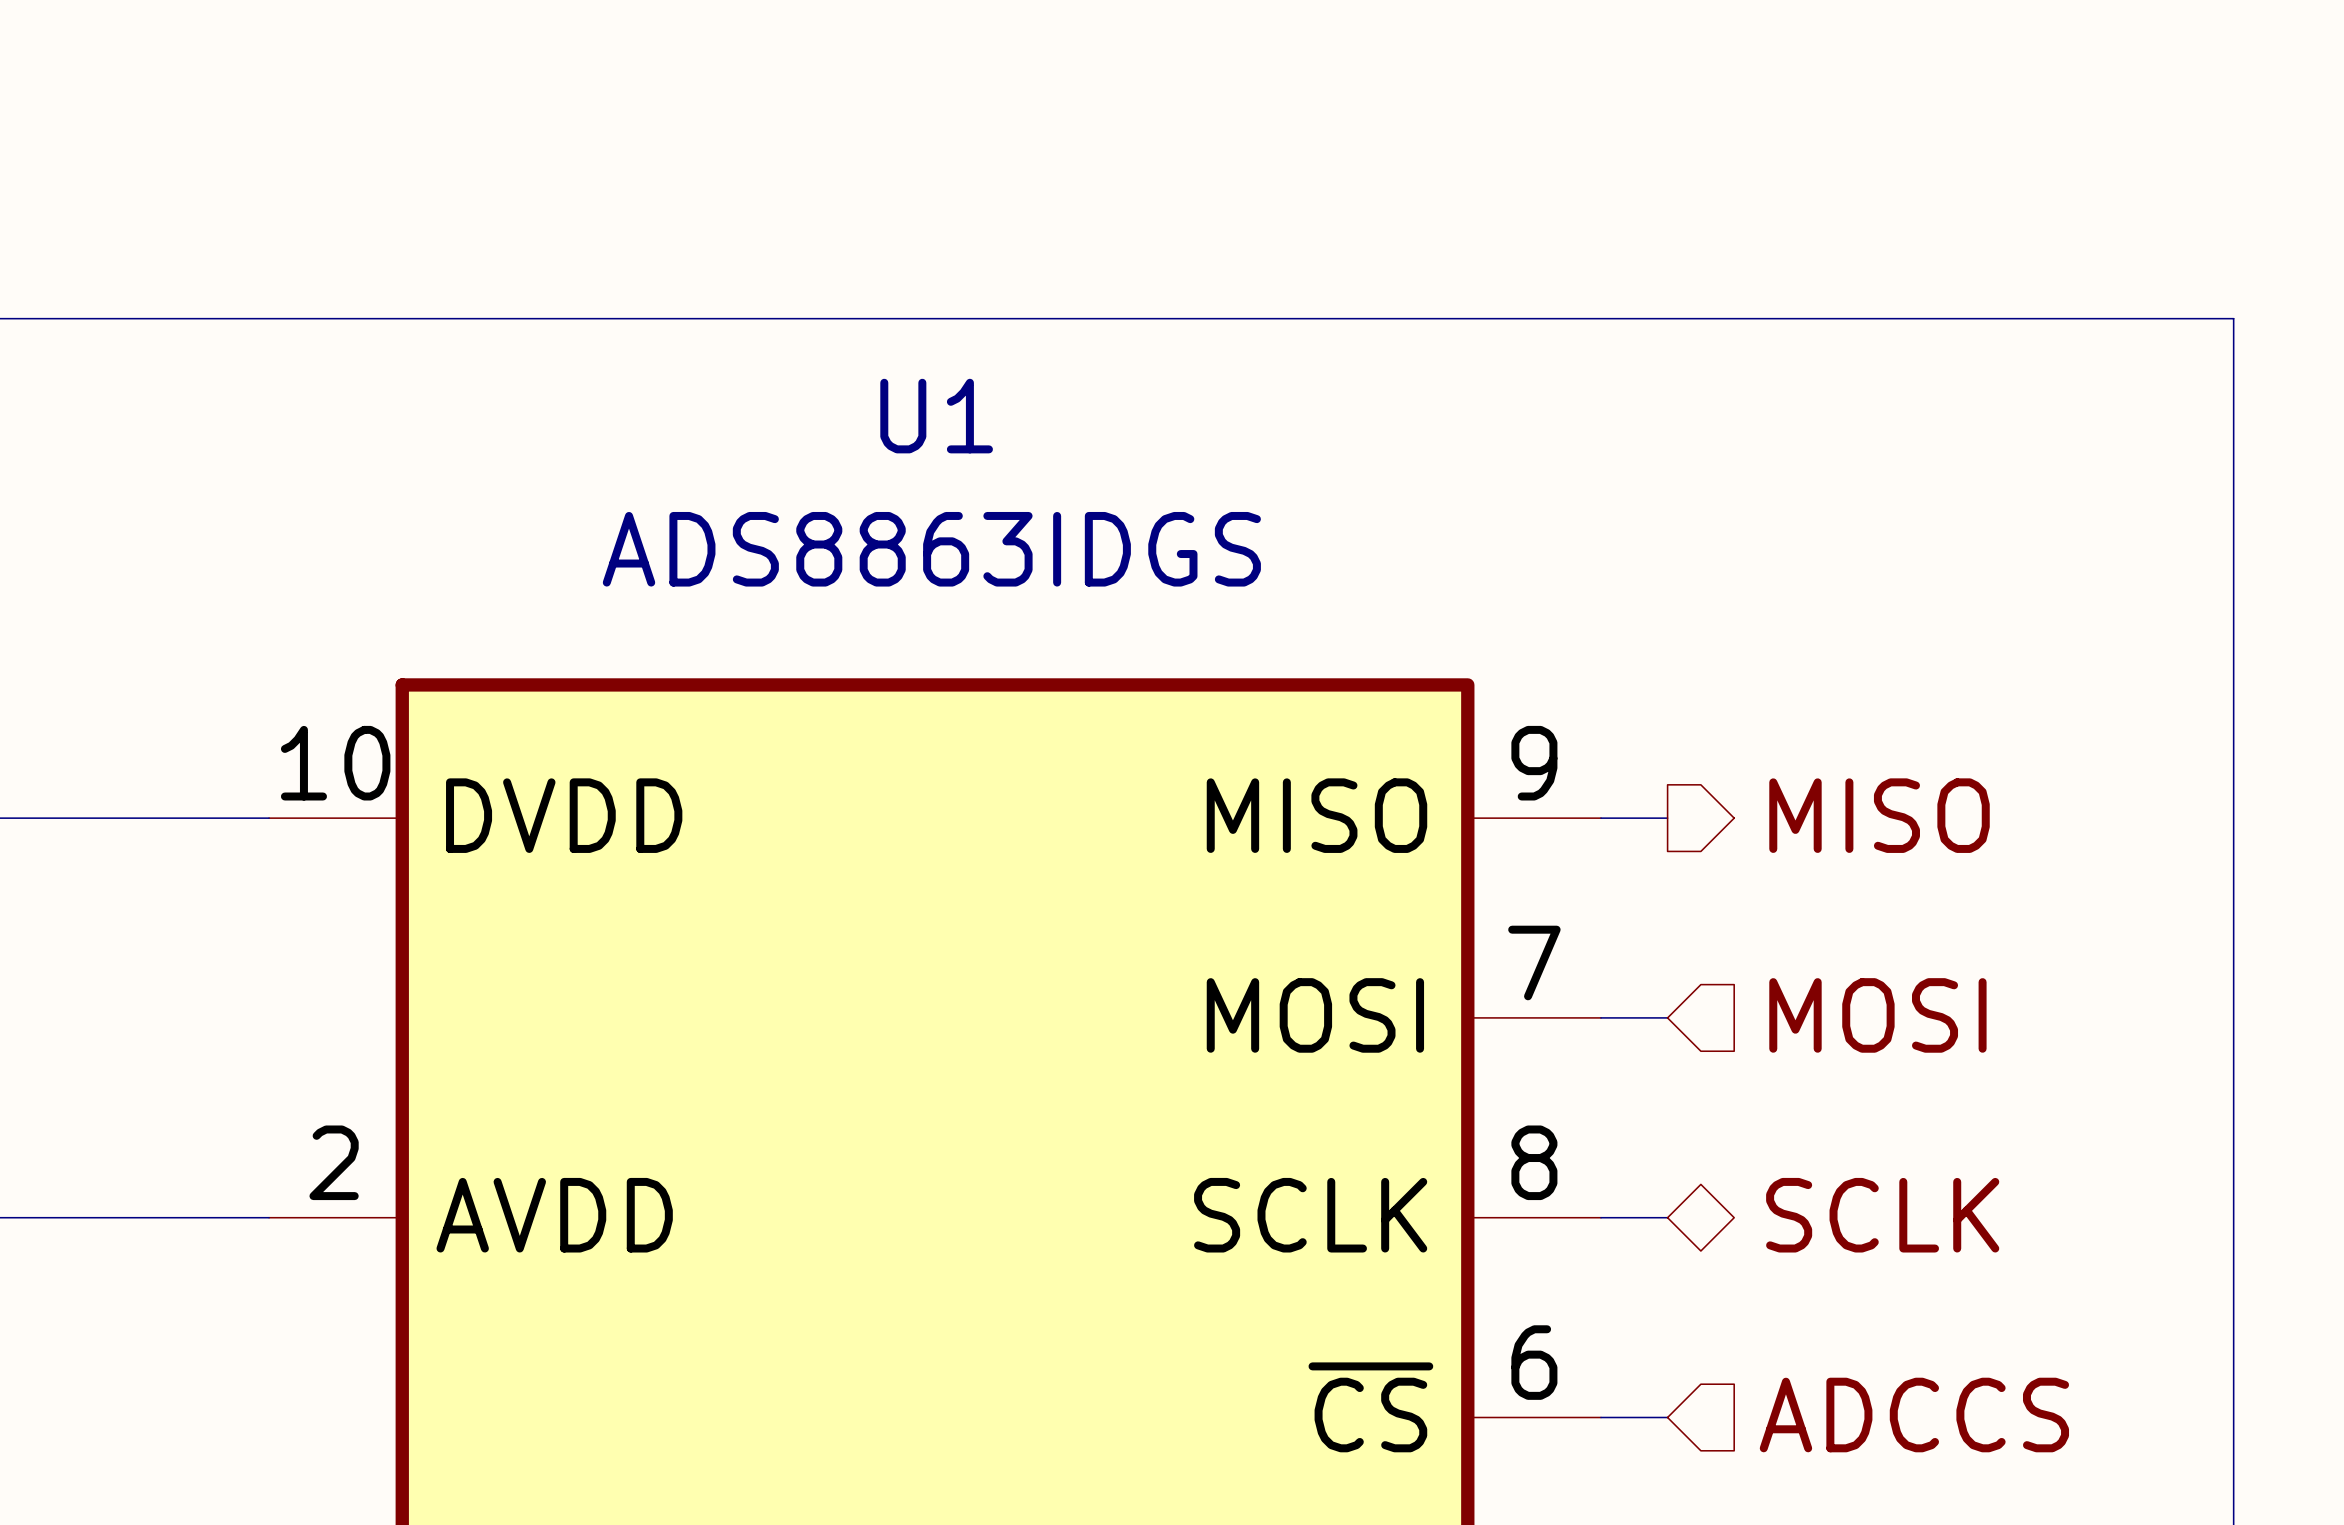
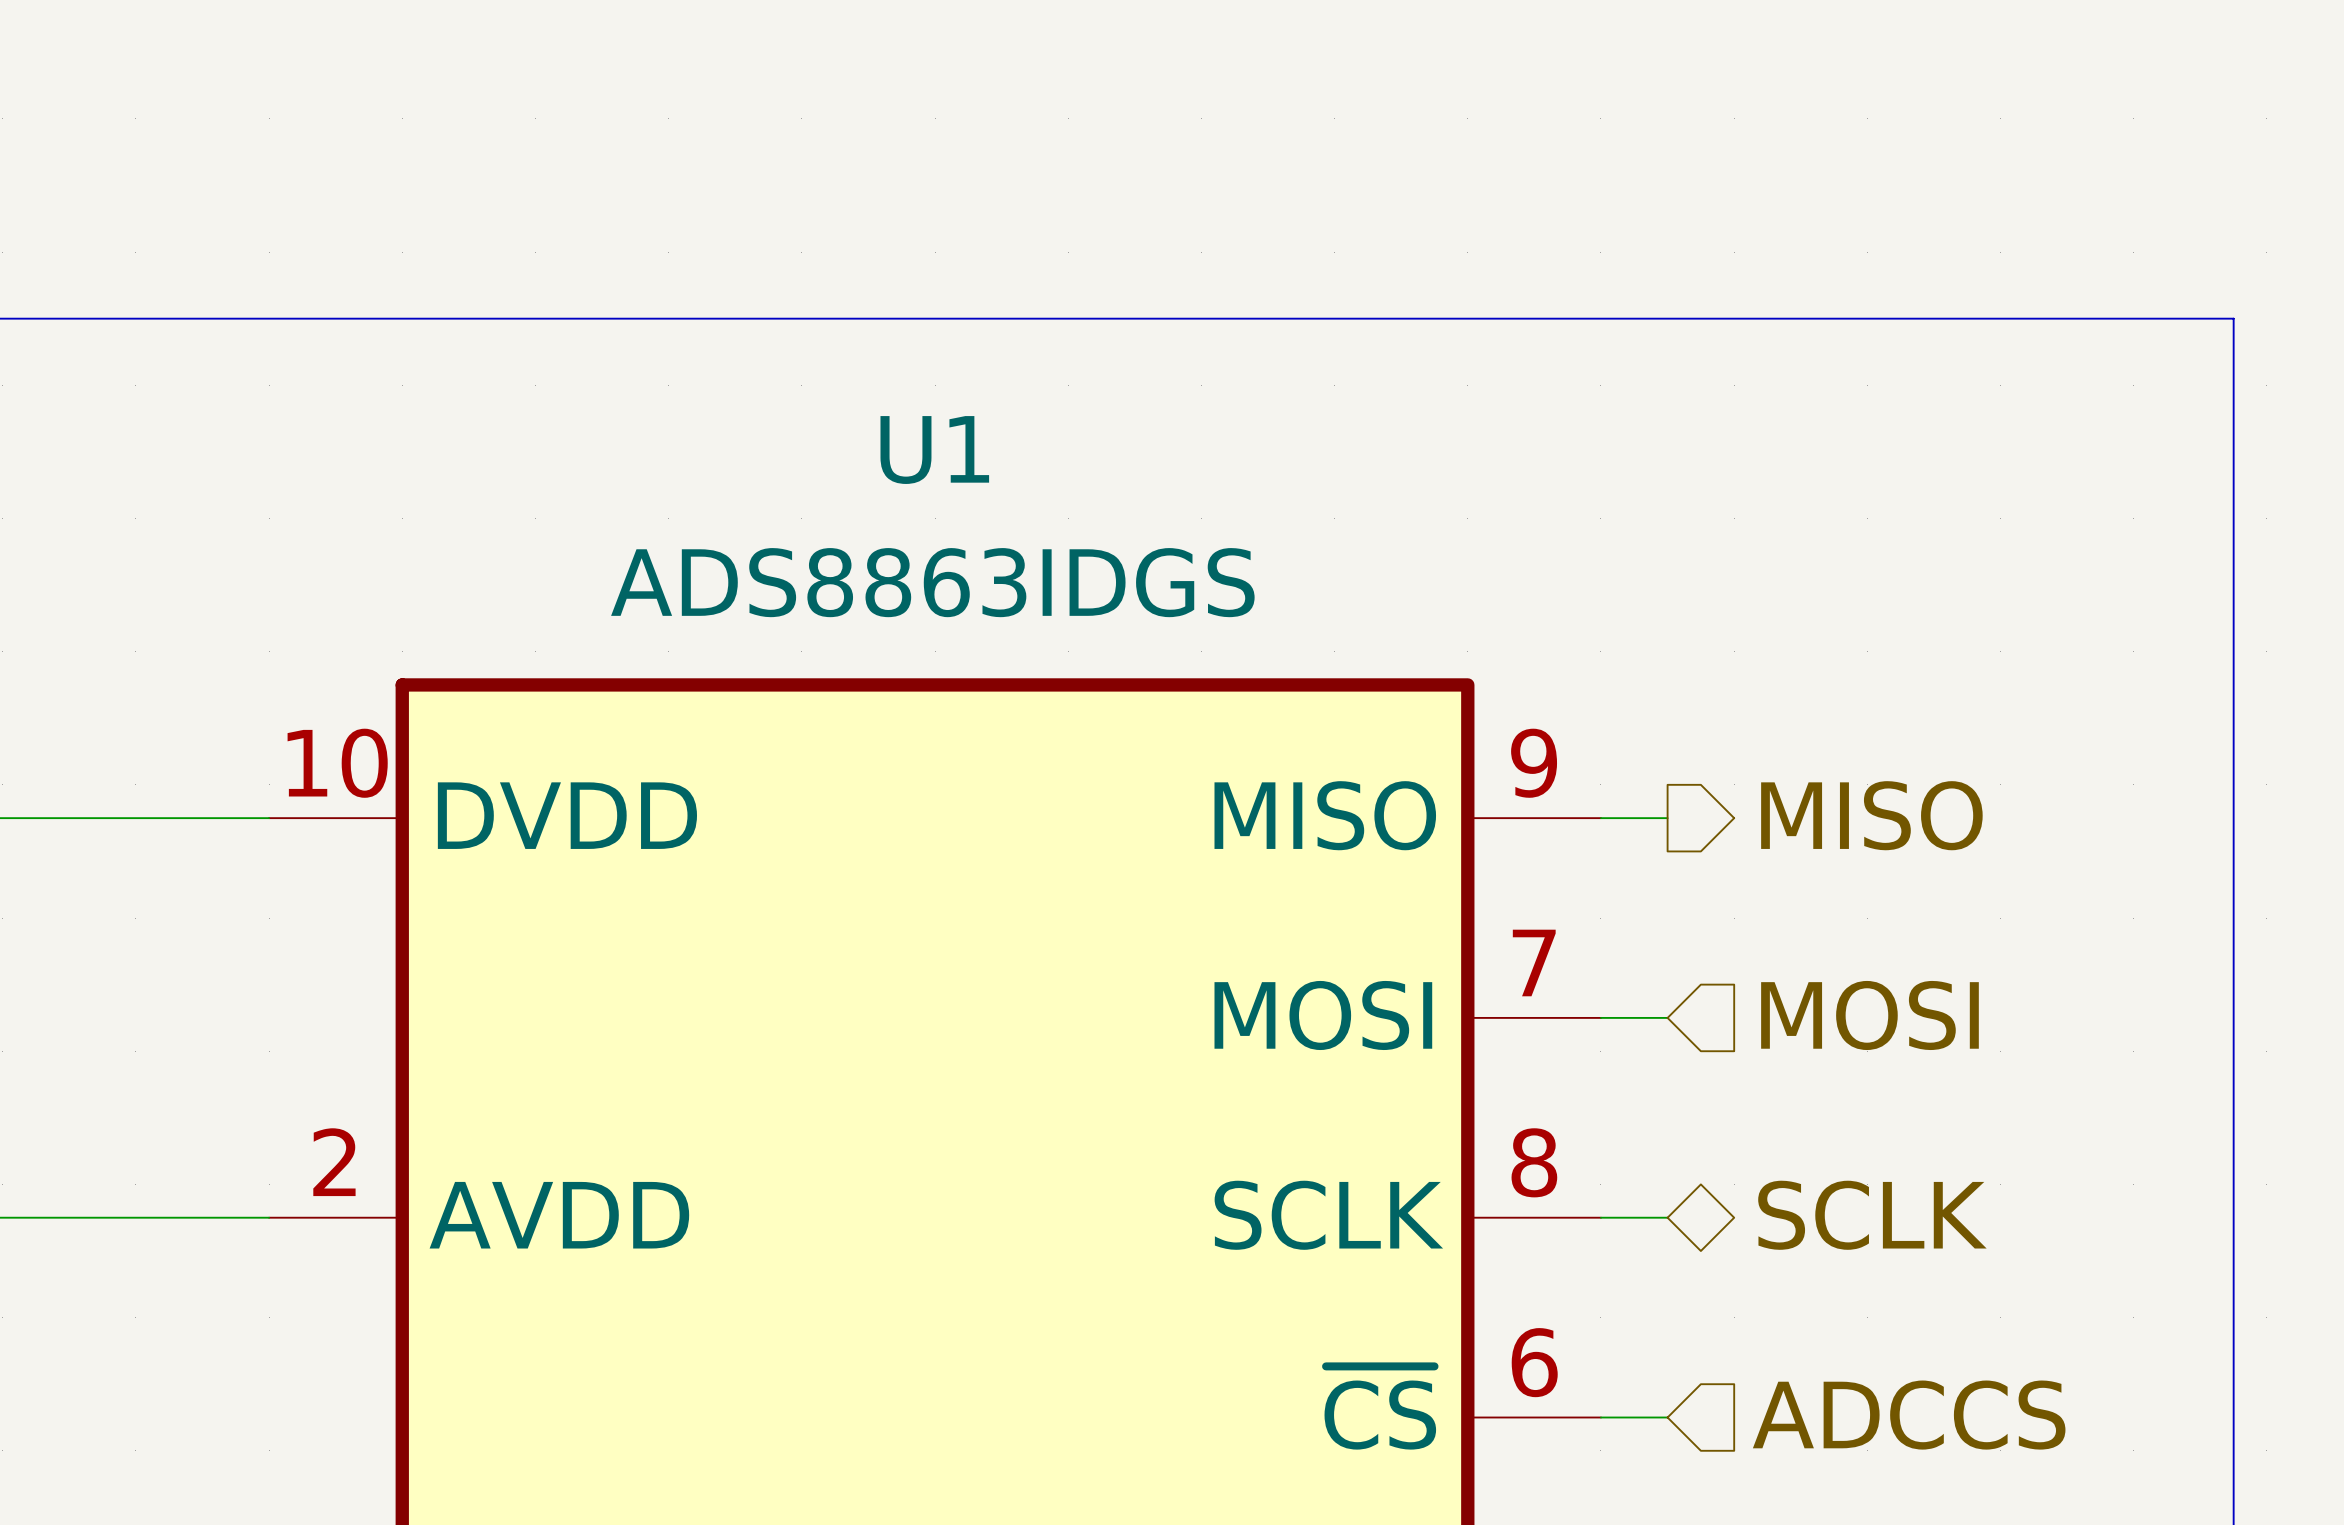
U1 name position: U1 (936, 416) -> U1 (934, 450)
U1 value position: ADS8863IDGS (931, 549) -> ADS8863IDGS (932, 582)

